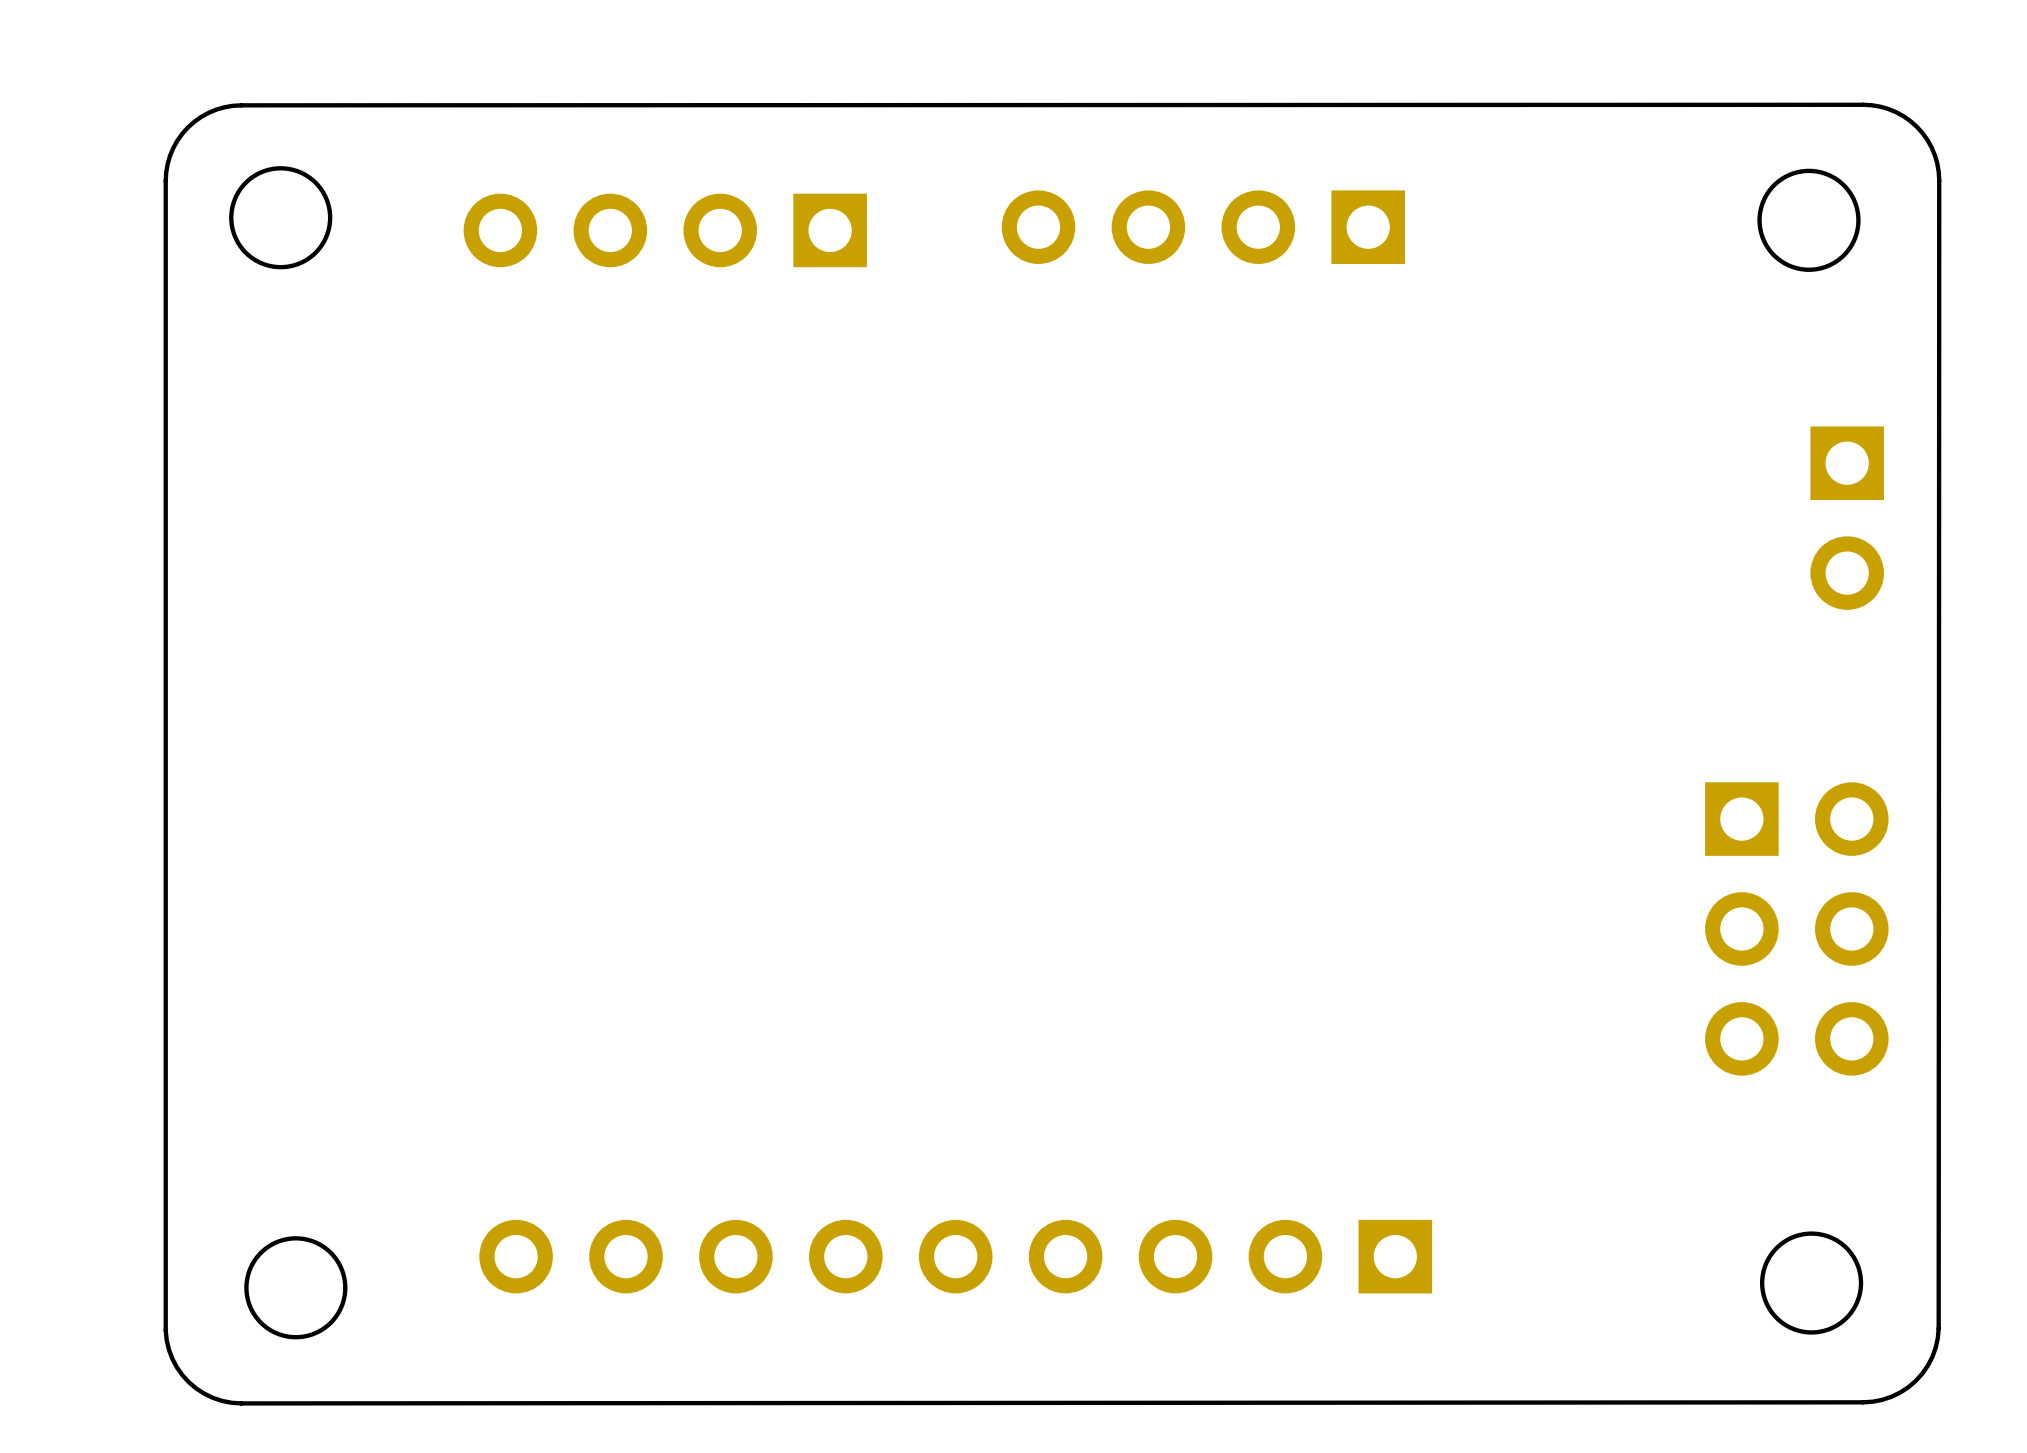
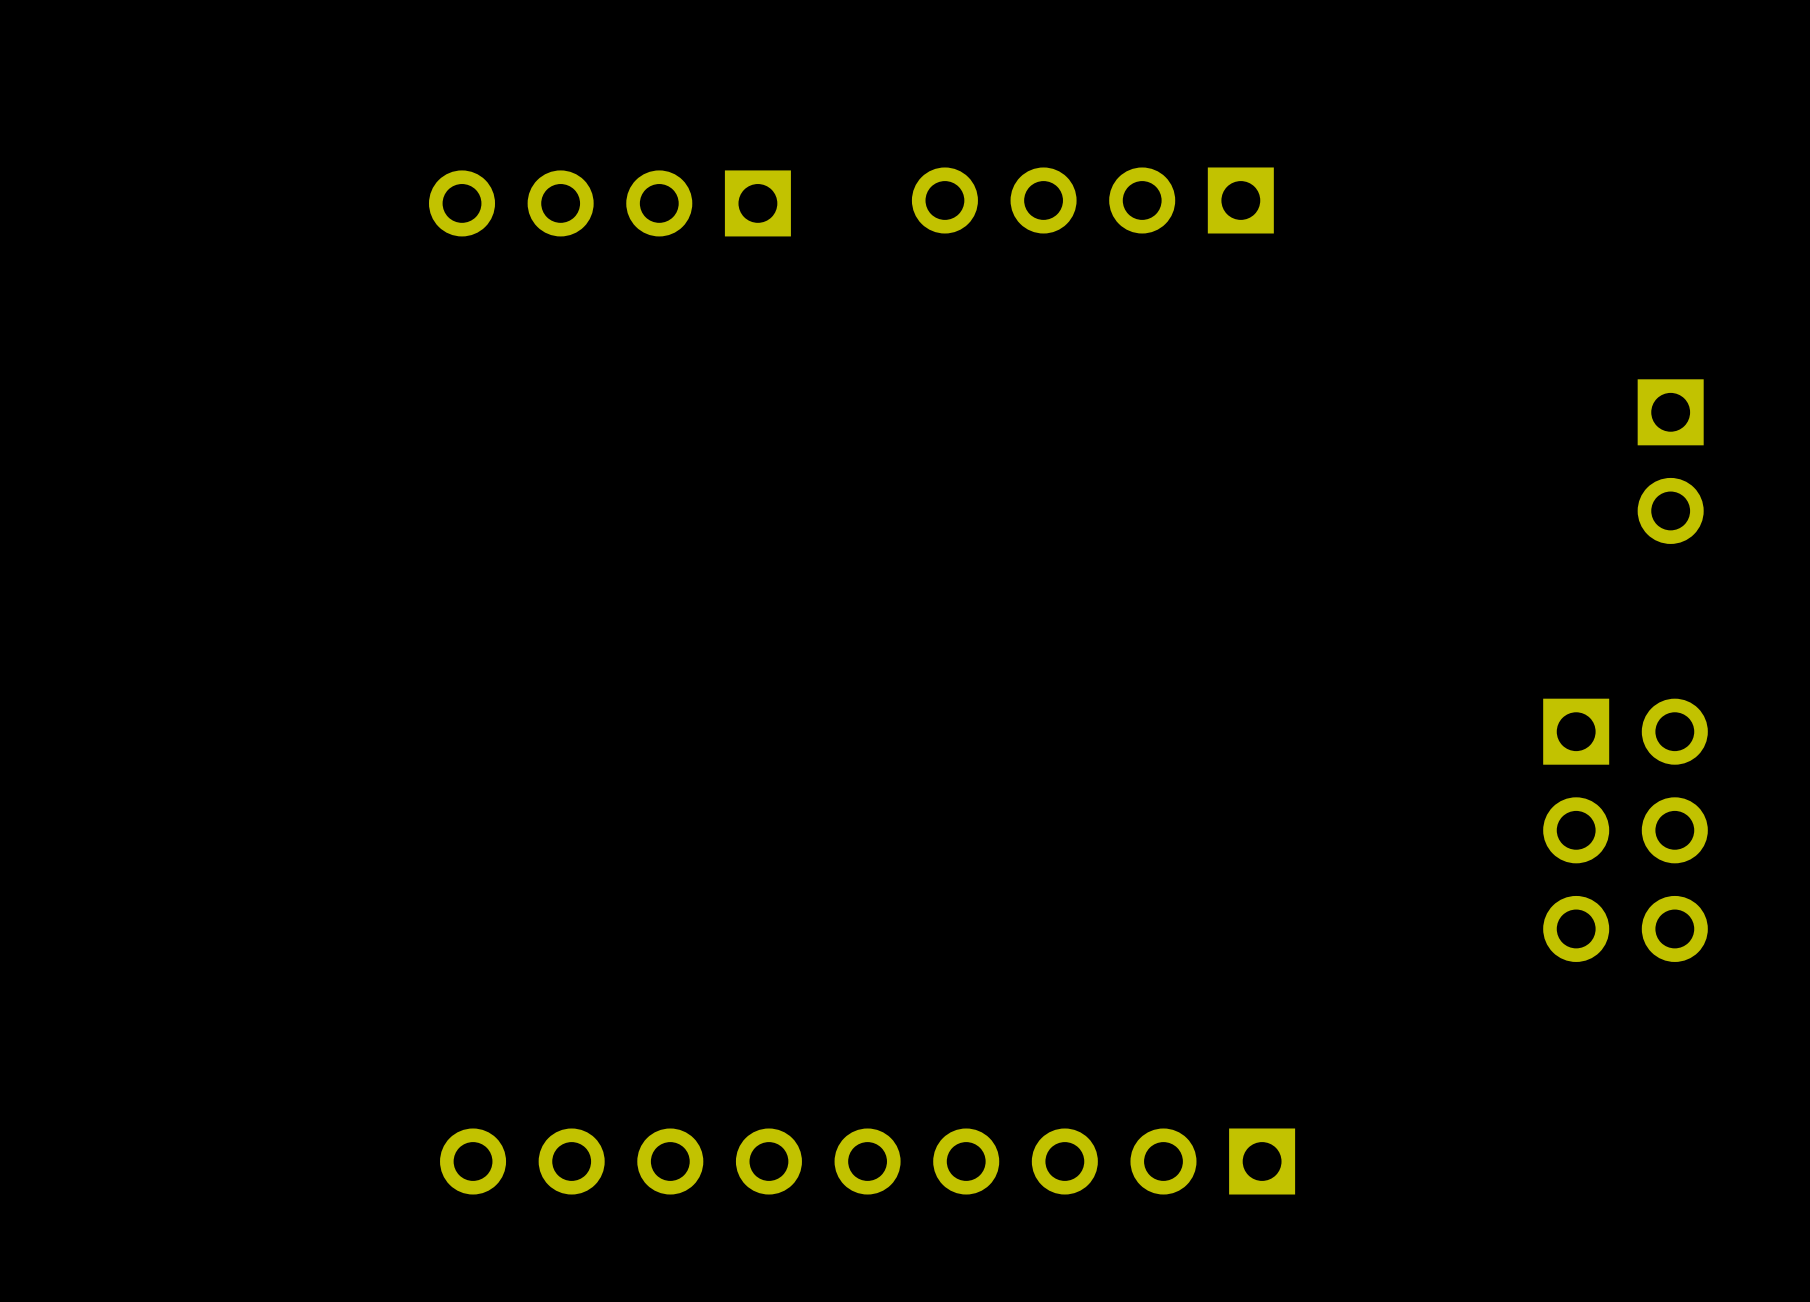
board edge: (1863, 104) (241, 105) (216, 109) (194, 121) (182, 133) (173, 148) (167, 164) (165, 181) (165, 1330) (168, 1349) (182, 1375) (196, 1388) (213, 1397) (241, 1403) (1862, 1402) (1882, 1399) (1908, 1387) (1922, 1373) (1932, 1356) (1938, 1328) (1939, 180) (1937, 163) (1931, 147) (1917, 126) (1896, 112) (1880, 106) (1863, 104) -> none
round board edge: [229, 166, 333, 270] -> none
round board edge: [1757, 168, 1861, 272] -> none
round board edge: [1759, 1231, 1864, 1335] -> none
round board edge: [244, 1236, 348, 1340] -> none
part position: (955, 1256) -> (867, 1161)

